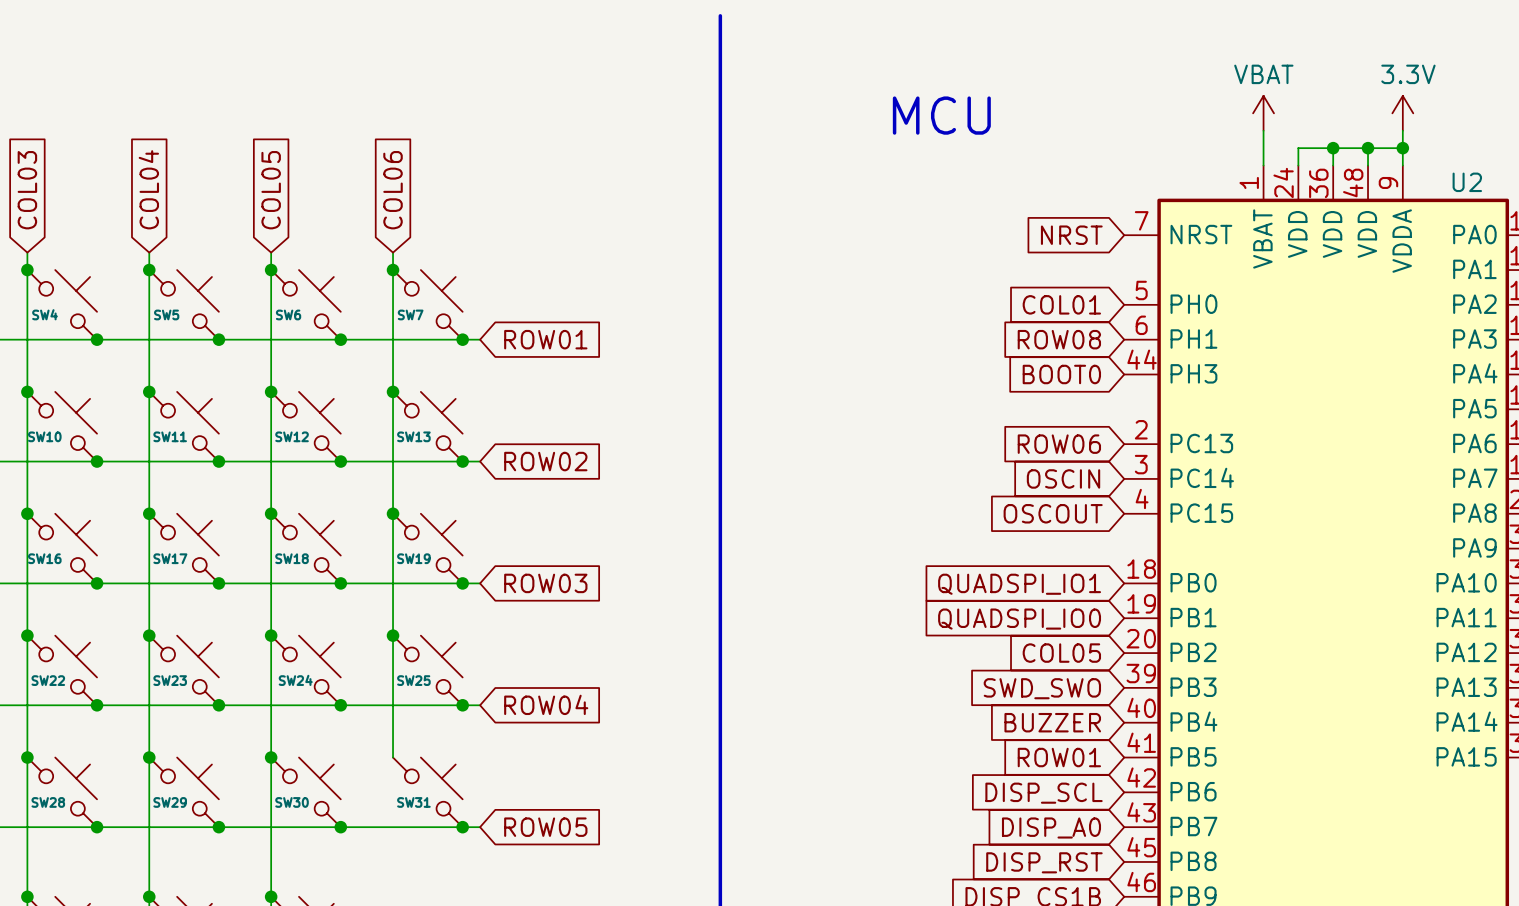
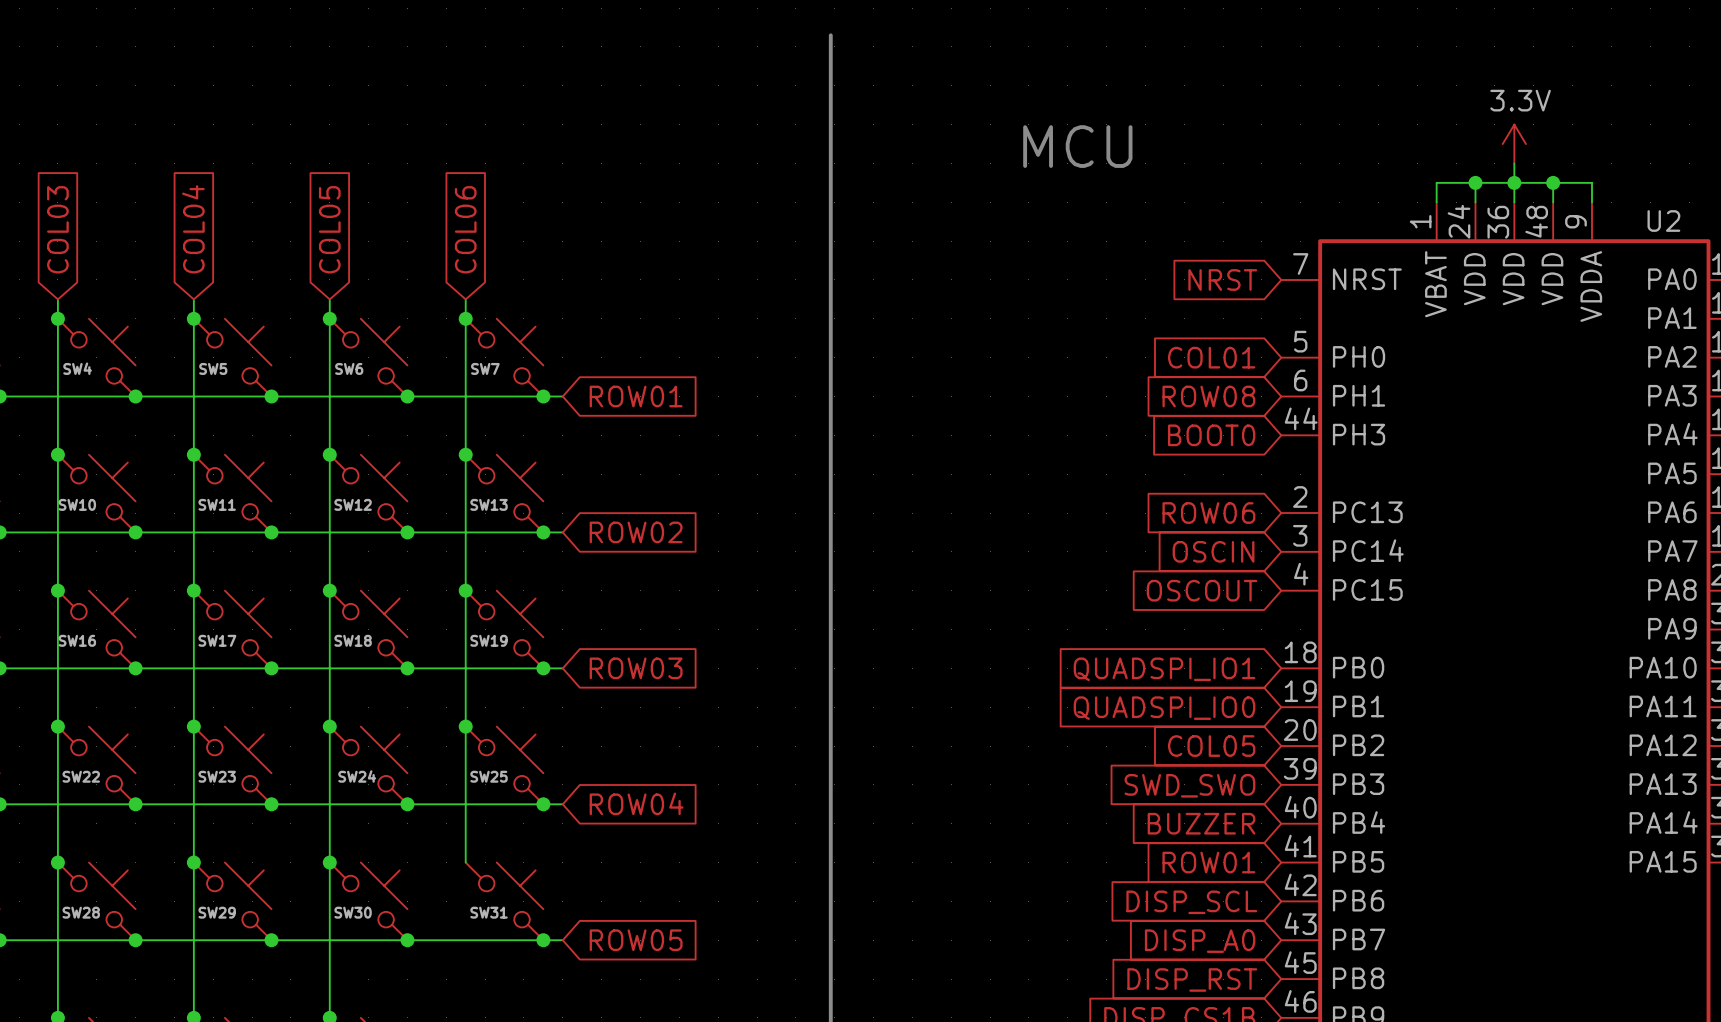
power symbol: VBAT (1263, 113) -> none
power symbol position: 3.3V (1402, 113) -> 3.3V (1514, 144)
wire: (1263, 130) (1263, 148) -> (1475, 182) (1436, 182)
wire: (1402, 130) (1402, 148) -> (1514, 163) (1514, 182)
junction: none -> (1475, 182)
junction: (1402, 148) -> none

